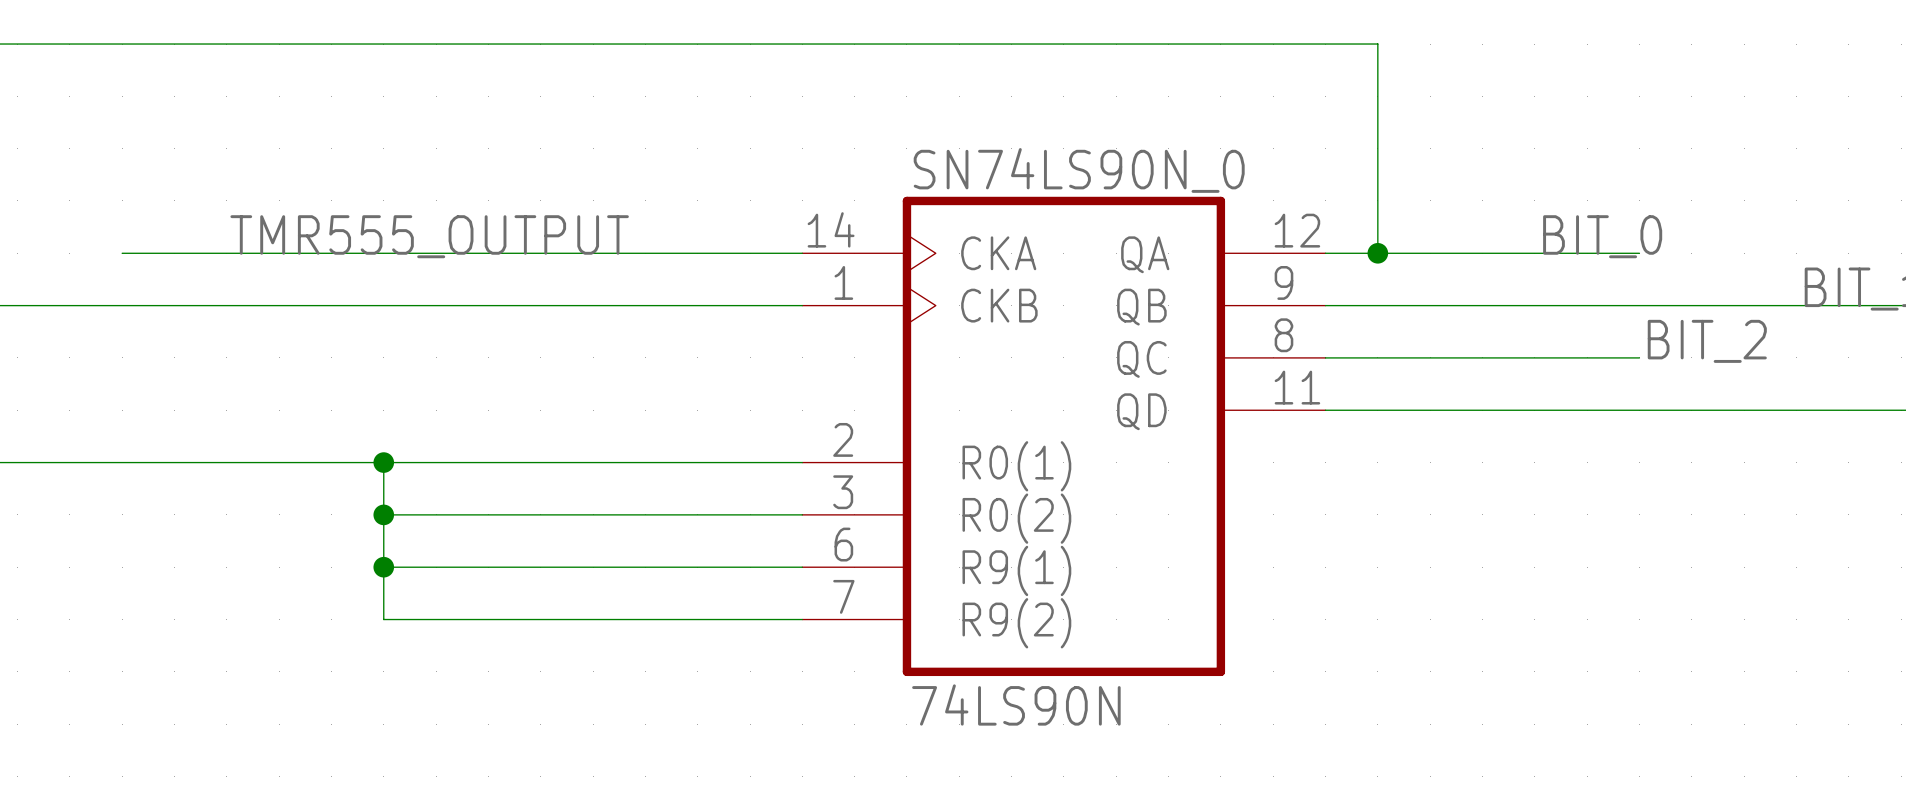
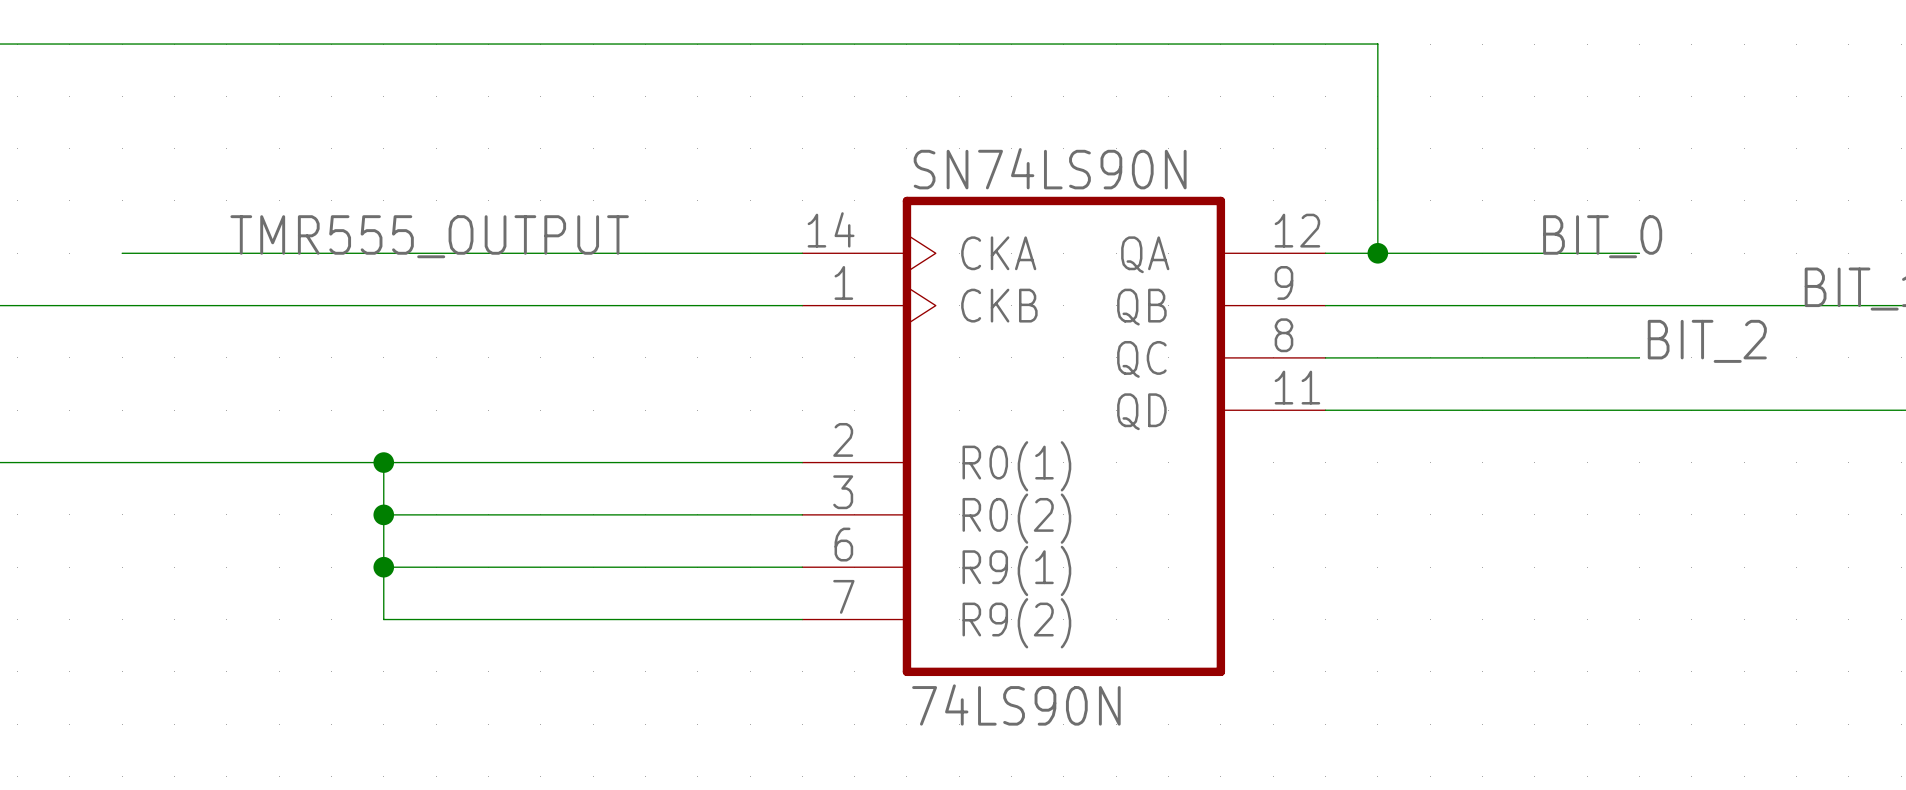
SN74LS90N_0 name: SN74LS90N_0 (1079, 170) -> SN74LS90N (1050, 168)

